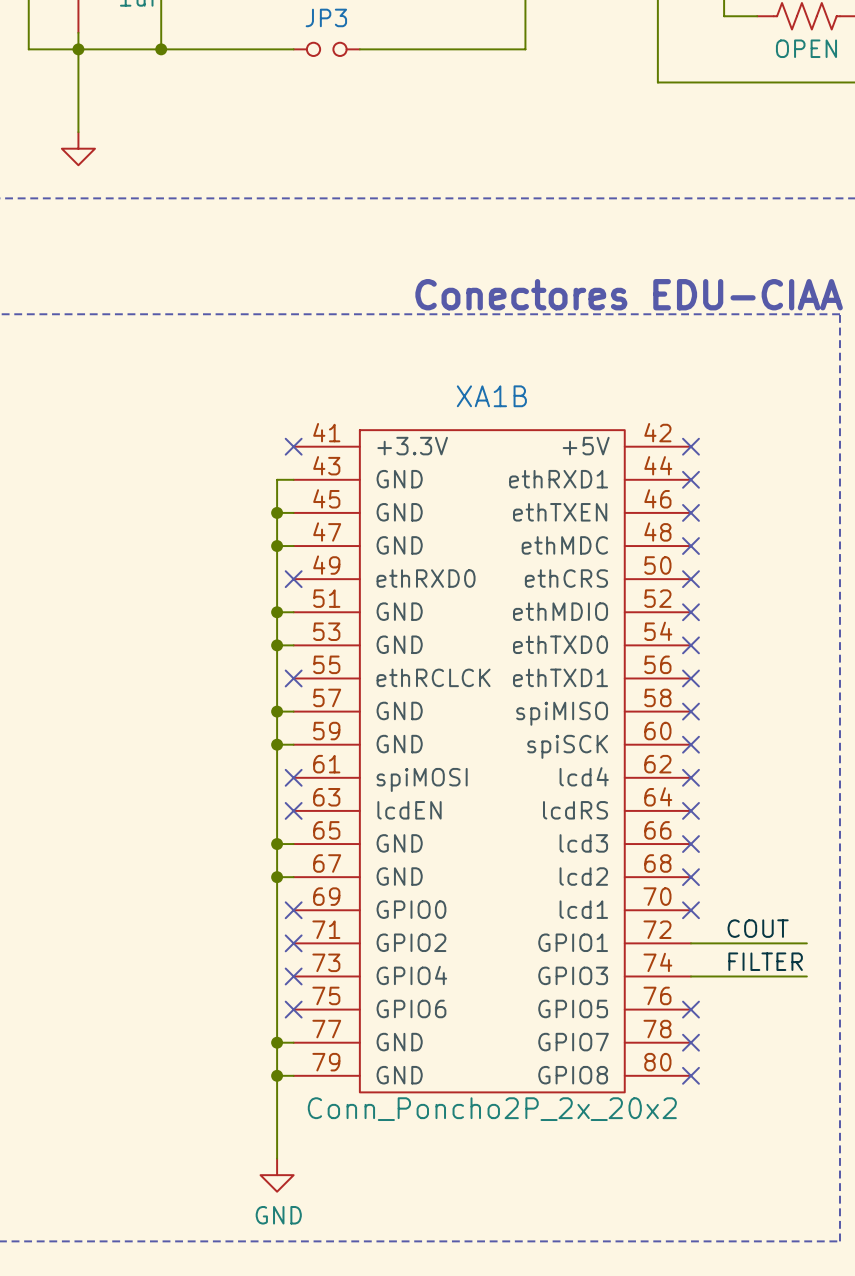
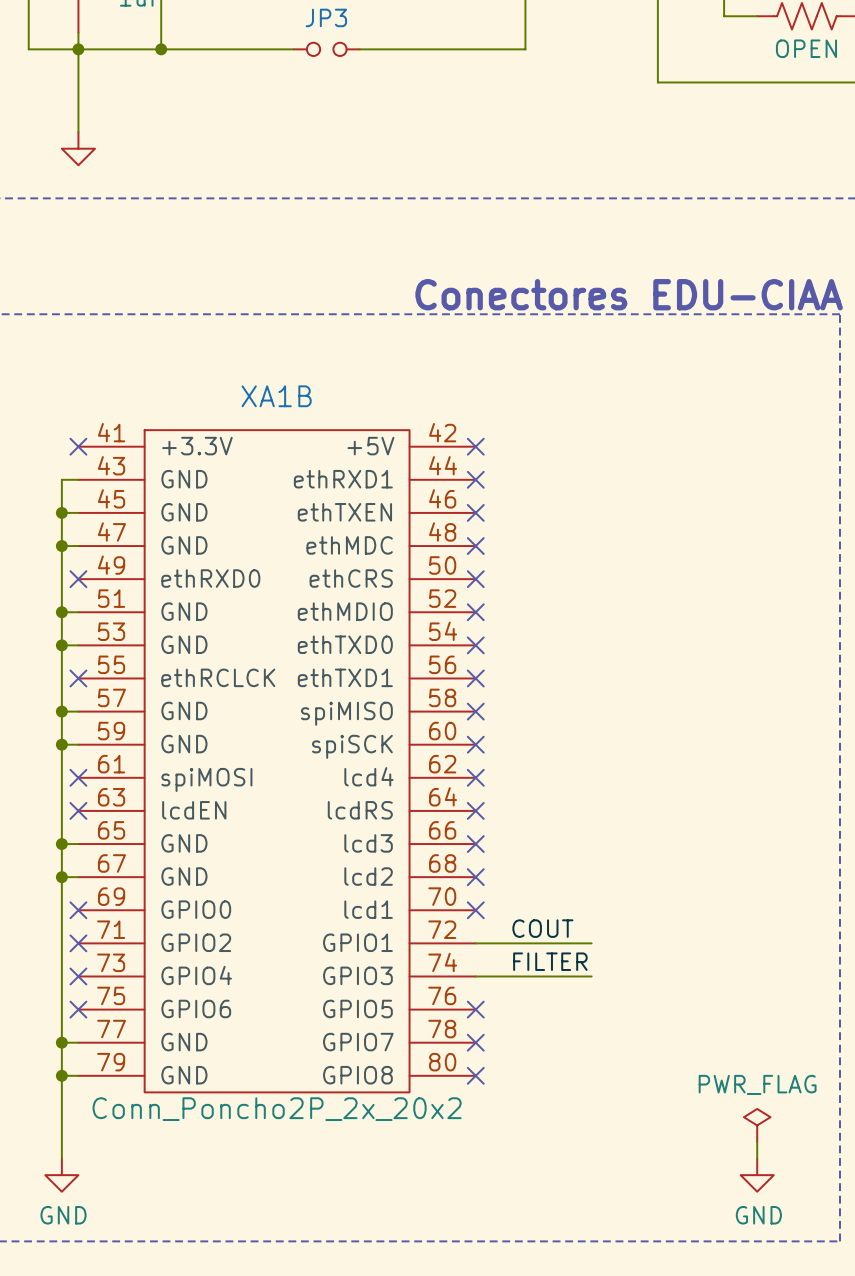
no-connect mark: none -> (78, 446)
no-connect mark: (293, 446) -> none
no-connect mark: none -> (475, 446)
no-connect mark: (690, 446) -> none
wire: (293, 479) (277, 479) (277, 1158) -> (78, 479) (61, 479) (61, 1158)
no-connect mark: none -> (475, 479)
no-connect mark: (690, 479) -> none
junction: none -> (61, 512)
wire: (277, 512) (293, 512) -> (61, 512) (78, 512)
junction: (277, 512) -> none
no-connect mark: none -> (475, 512)
no-connect mark: (690, 512) -> none
junction: none -> (61, 546)
wire: (277, 546) (293, 546) -> (61, 546) (78, 546)
junction: (277, 546) -> none
no-connect mark: none -> (475, 546)
no-connect mark: (690, 546) -> none
no-connect mark: none -> (78, 579)
no-connect mark: (293, 579) -> none
no-connect mark: none -> (475, 579)
no-connect mark: (690, 579) -> none
junction: none -> (61, 612)
wire: (277, 612) (293, 612) -> (61, 612) (78, 612)
junction: (277, 612) -> none
no-connect mark: none -> (475, 612)
no-connect mark: (690, 612) -> none
junction: none -> (61, 645)
wire: (277, 645) (293, 645) -> (61, 645) (78, 645)
junction: (277, 645) -> none
no-connect mark: none -> (475, 645)
no-connect mark: (690, 645) -> none
no-connect mark: none -> (78, 678)
no-connect mark: (293, 678) -> none
no-connect mark: none -> (475, 678)
no-connect mark: (690, 678) -> none
junction: none -> (61, 711)
wire: (277, 711) (293, 711) -> (61, 711) (78, 711)
junction: (277, 711) -> none
no-connect mark: none -> (475, 711)
no-connect mark: (690, 711) -> none
junction: none -> (61, 744)
wire: (277, 744) (293, 744) -> (61, 744) (78, 744)
junction: (277, 744) -> none
no-connect mark: none -> (475, 744)
no-connect mark: (690, 744) -> none
XA1B position: (492, 761) -> (277, 761)
no-connect mark: none -> (78, 777)
no-connect mark: (293, 777) -> none
no-connect mark: none -> (475, 777)
no-connect mark: (690, 777) -> none
no-connect mark: none -> (78, 810)
no-connect mark: (293, 810) -> none
no-connect mark: none -> (475, 810)
no-connect mark: (690, 810) -> none
junction: none -> (61, 844)
wire: (277, 844) (293, 844) -> (61, 844) (78, 844)
junction: (277, 844) -> none
no-connect mark: none -> (475, 844)
no-connect mark: (690, 844) -> none
junction: none -> (61, 877)
wire: (277, 877) (293, 877) -> (61, 877) (78, 877)
junction: (277, 877) -> none
no-connect mark: none -> (475, 877)
no-connect mark: (690, 877) -> none
no-connect mark: none -> (78, 910)
no-connect mark: (293, 910) -> none
no-connect mark: none -> (475, 910)
no-connect mark: (690, 910) -> none
label position: COUT (758, 928) -> COUT (542, 928)
no-connect mark: none -> (78, 943)
no-connect mark: (293, 943) -> none
wire: (690, 943) (806, 943) -> (475, 943) (591, 943)
label position: FILTER (765, 961) -> FILTER (550, 961)
no-connect mark: none -> (78, 976)
no-connect mark: (293, 976) -> none
wire: (690, 976) (806, 976) -> (475, 976) (591, 976)
no-connect mark: none -> (78, 1009)
no-connect mark: (293, 1009) -> none
no-connect mark: none -> (475, 1009)
no-connect mark: (690, 1009) -> none
junction: none -> (61, 1042)
wire: (277, 1042) (293, 1042) -> (61, 1042) (78, 1042)
junction: (277, 1042) -> none
no-connect mark: none -> (475, 1042)
no-connect mark: (690, 1042) -> none
junction: none -> (61, 1075)
wire: (277, 1075) (293, 1075) -> (61, 1075) (78, 1075)
junction: (277, 1075) -> none
no-connect mark: none -> (475, 1075)
no-connect mark: (690, 1075) -> none
power symbol: none -> PWR_FLAG (757, 1125)
wire: none -> (757, 1142) (757, 1158)
power symbol position: GND (277, 1175) -> GND (61, 1175)
power symbol: none -> GND (757, 1175)

